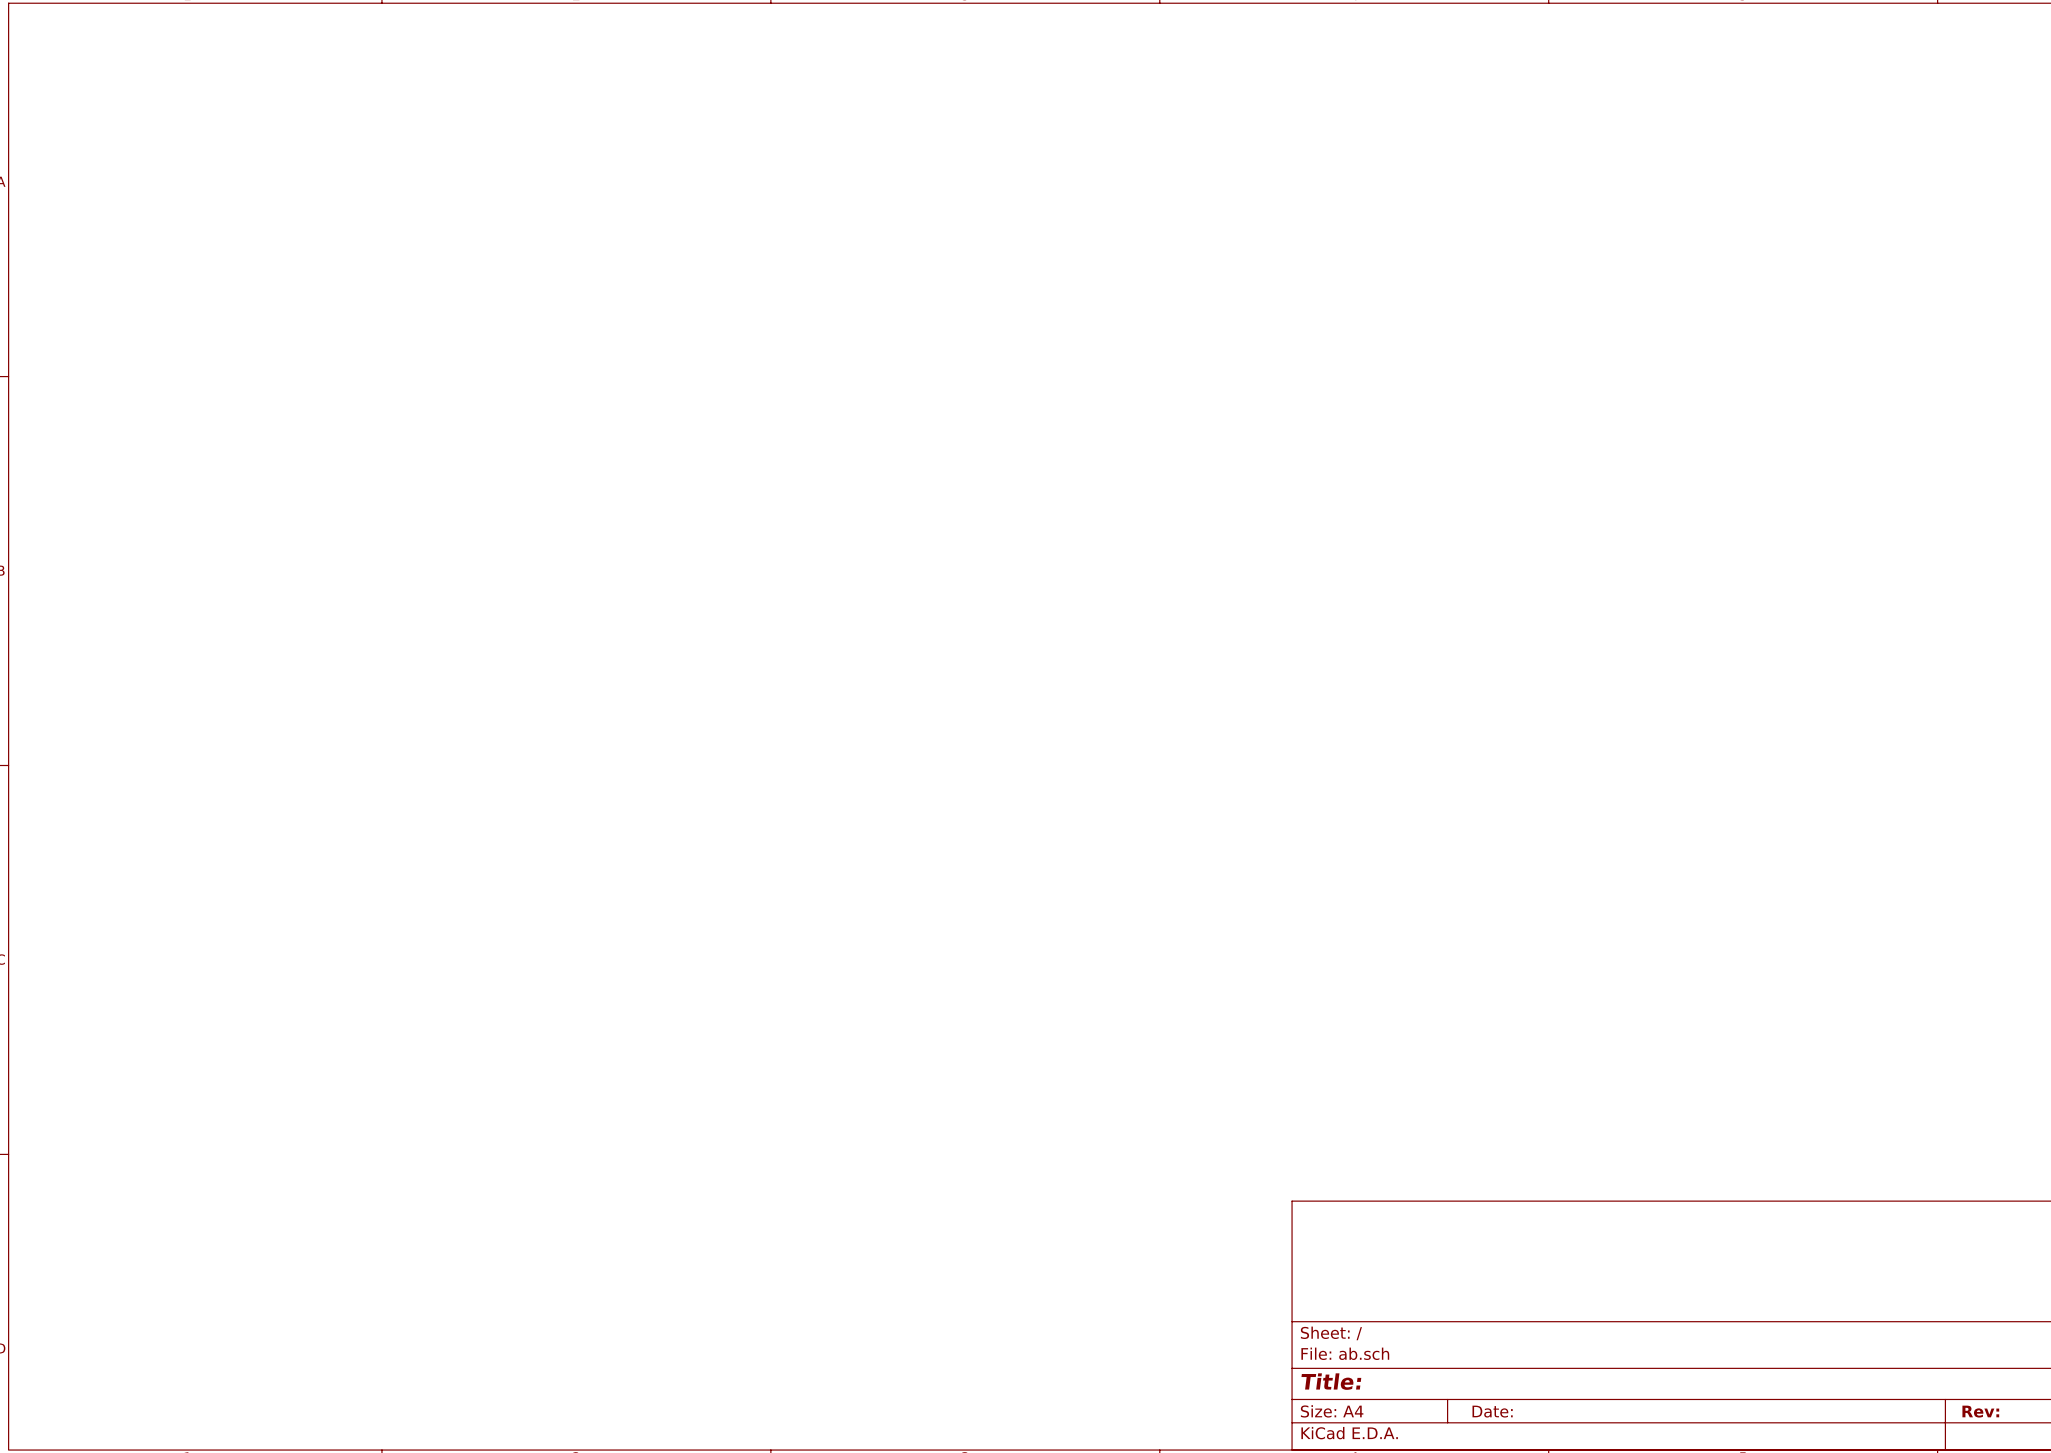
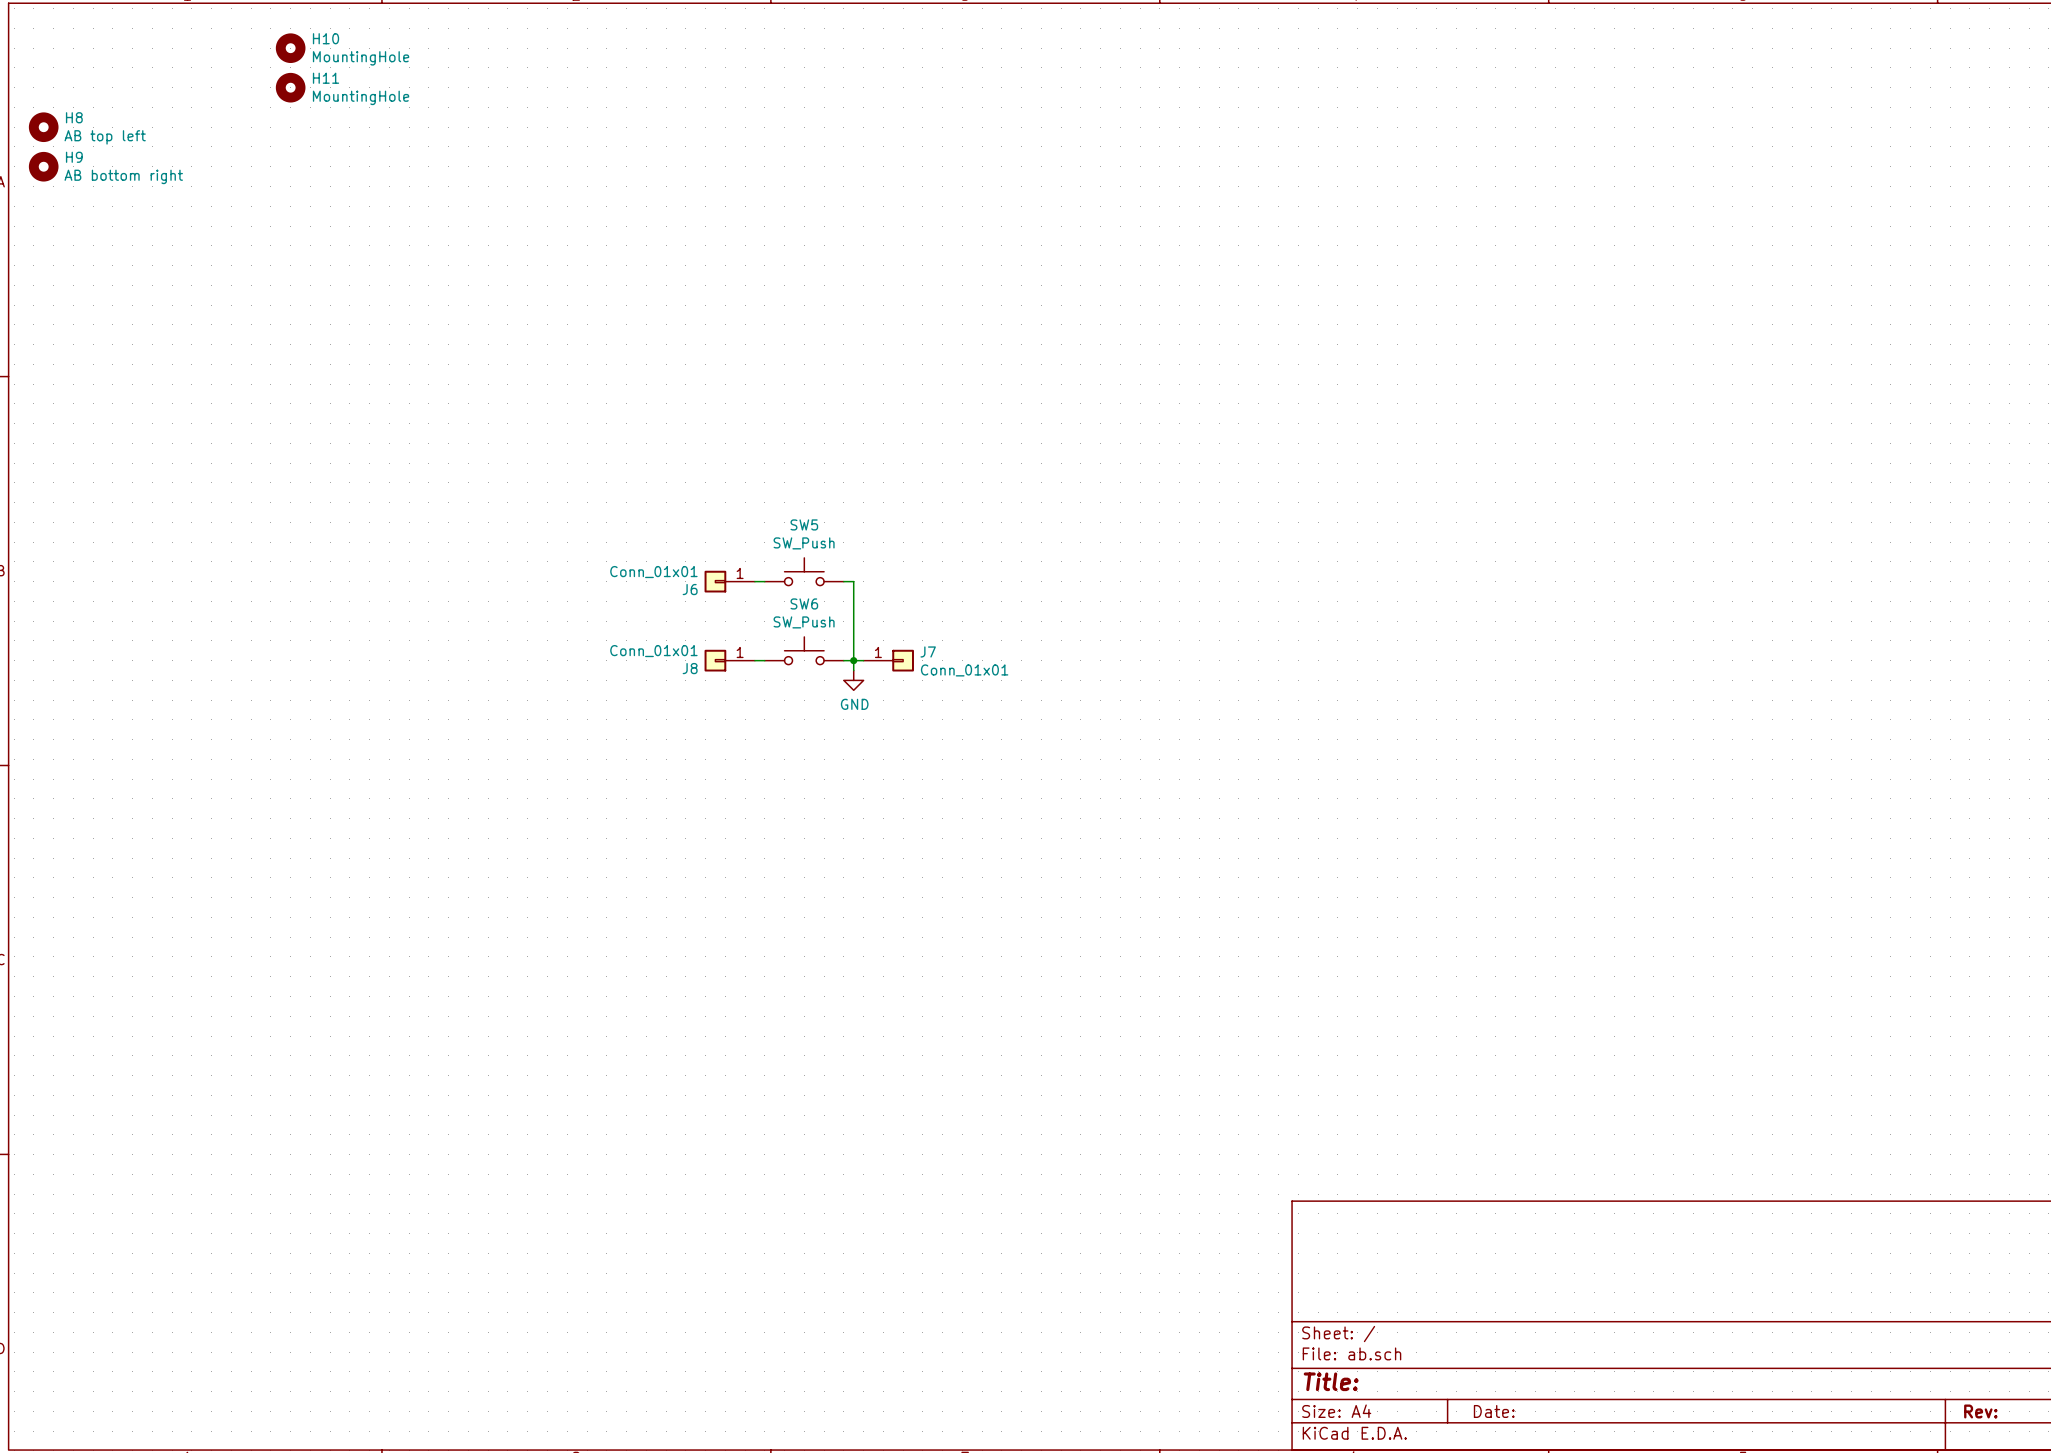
H10: none -> MountingHole (290, 48)
H11: none -> MountingHole (290, 87)
H8: none -> AB top left (43, 127)
H9: none -> AB bottom right (43, 166)
SW5: none -> SW_Push (804, 571)
J6: none -> Conn_01x01 (729, 581)
wire: none -> (754, 581) (764, 581)
wire: none -> (843, 581) (853, 581) (853, 670)
SW6: none -> SW_Push (804, 650)
J8: none -> Conn_01x01 (729, 660)
wire: none -> (754, 660) (764, 660)
wire: none -> (843, 660) (863, 660)
junction: none -> (853, 660)
J7: none -> Conn_01x01 (888, 660)
power symbol: none -> GND (853, 680)

